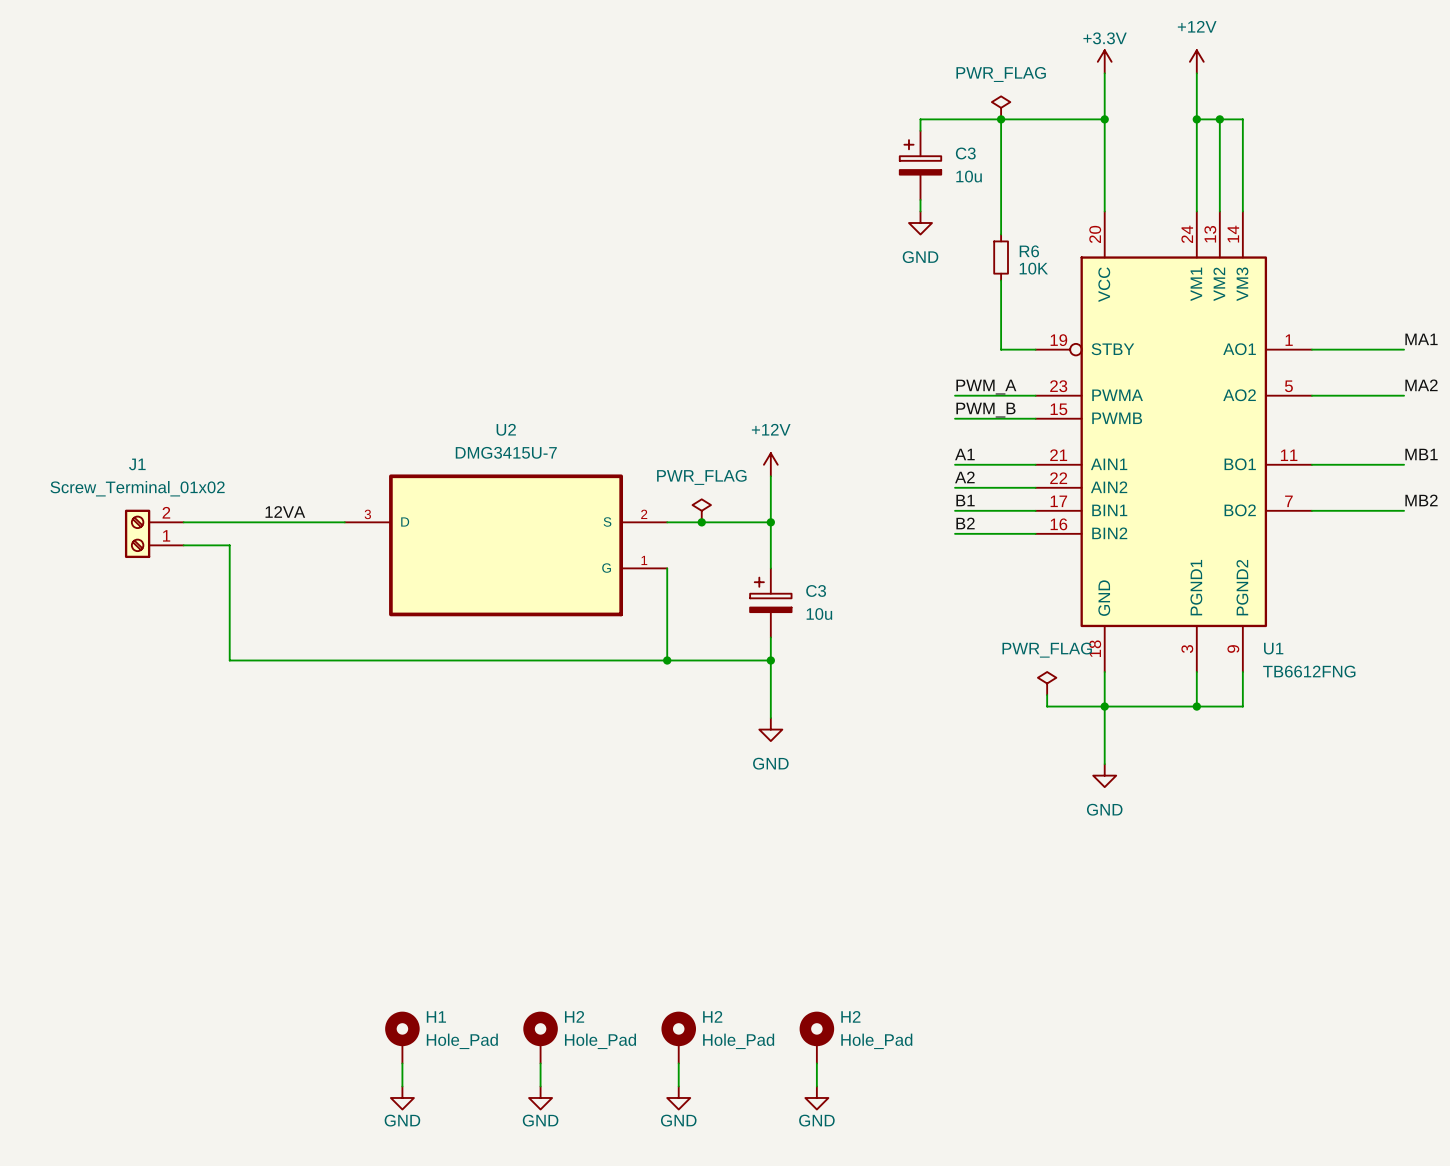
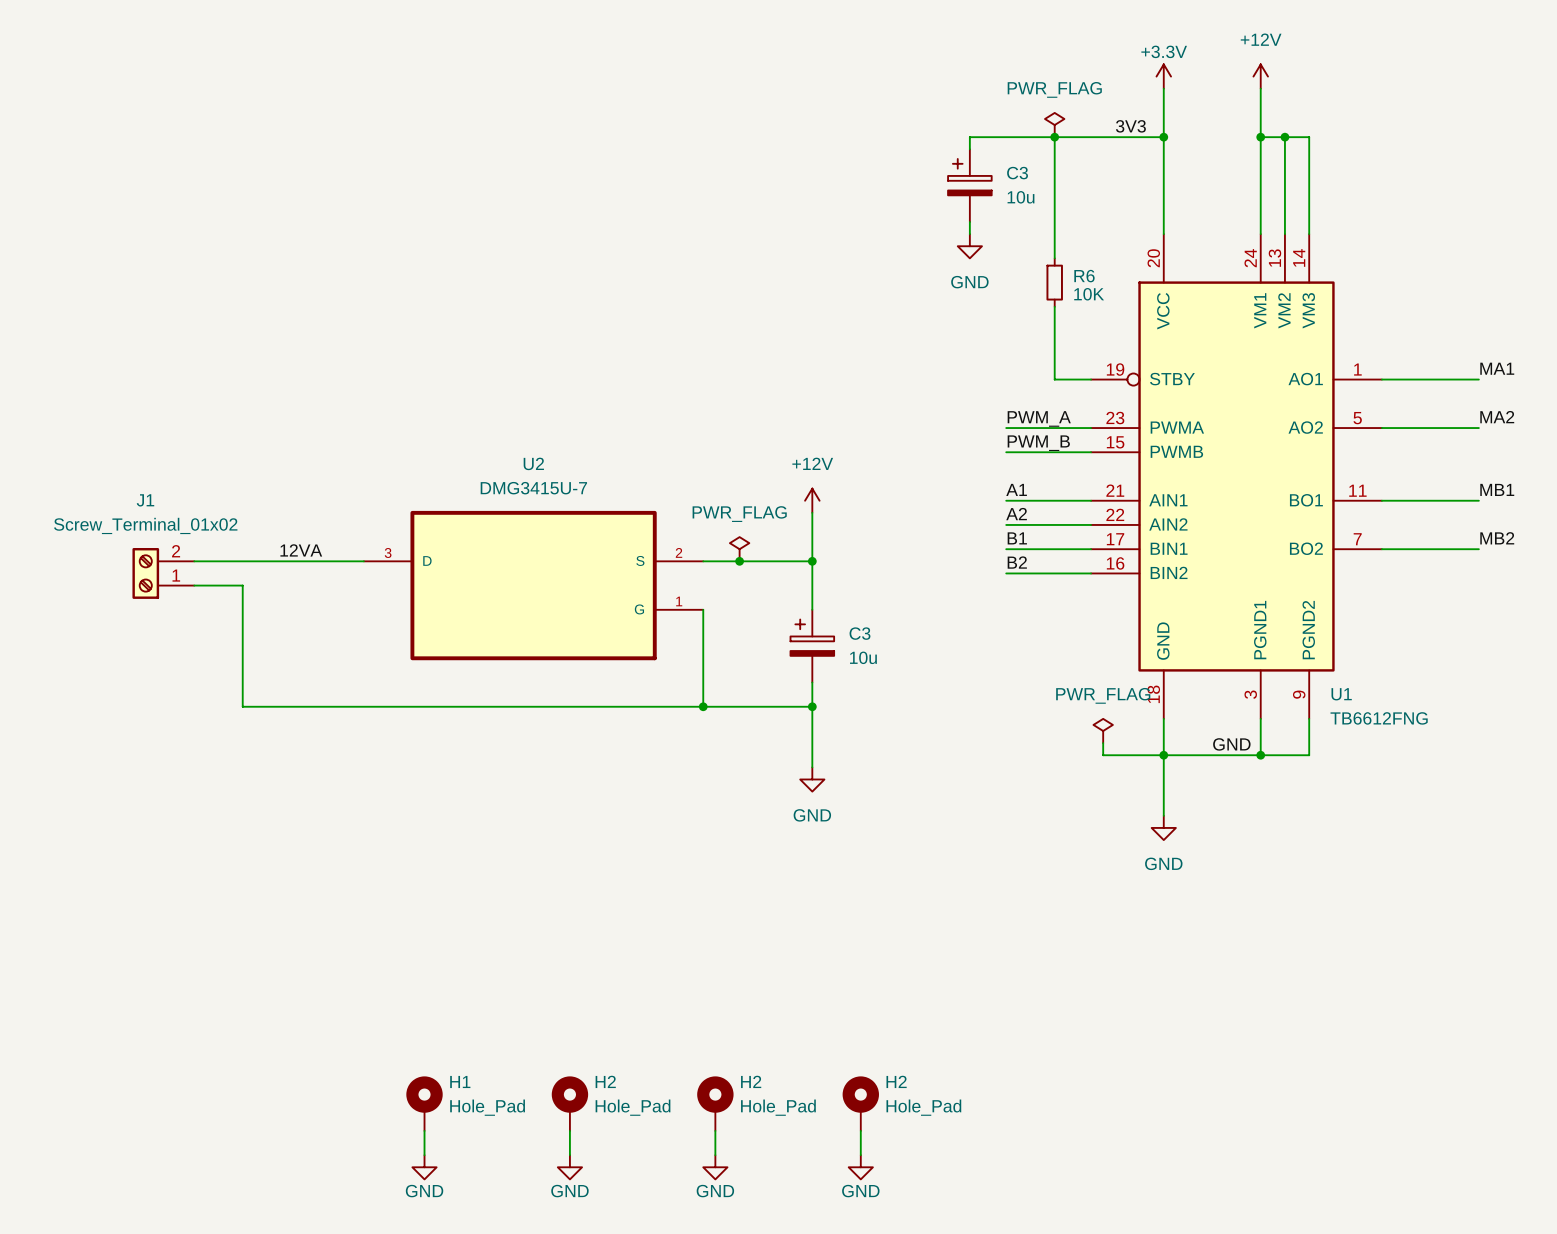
label: none -> 3V3 (1130, 126)
label: none -> GND (1231, 744)

